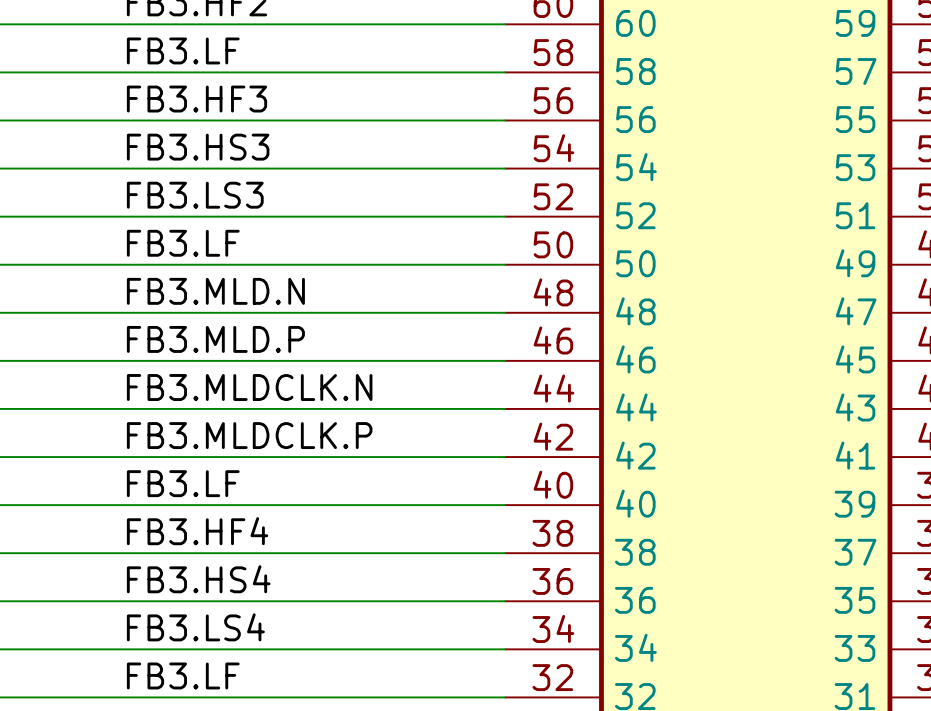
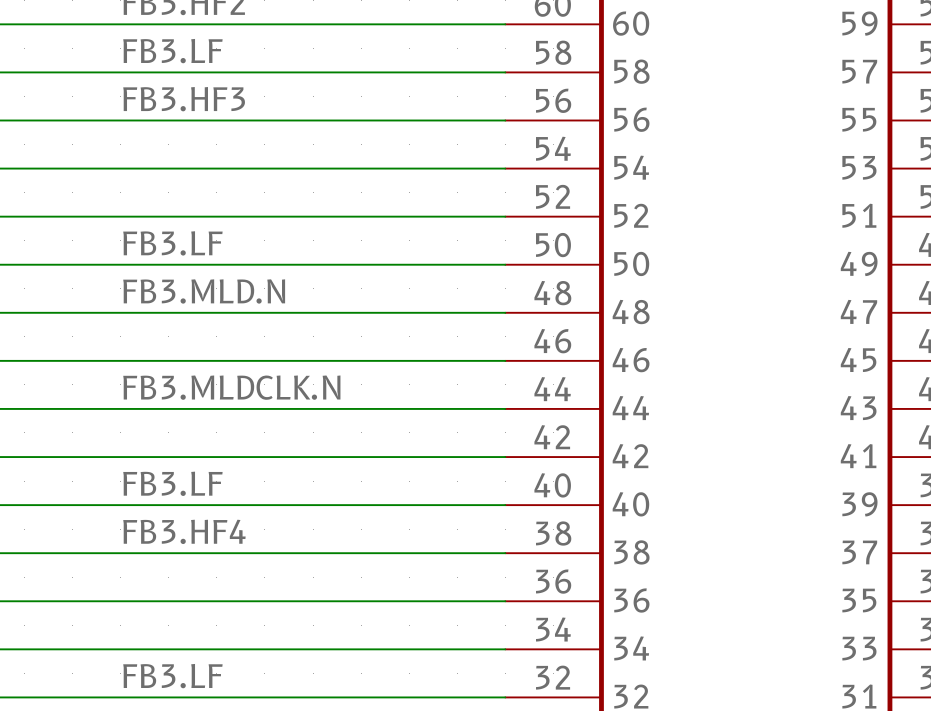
label: FB3.HS3 (198, 147) -> none
label: FB3.LS3 (195, 195) -> none
label: FB3.MLD.P (215, 339) -> none
label: FB3.MLDCLK.P (249, 435) -> none
label: FB3.HS4 (198, 579) -> none
label: FB3.LS4 (195, 627) -> none

